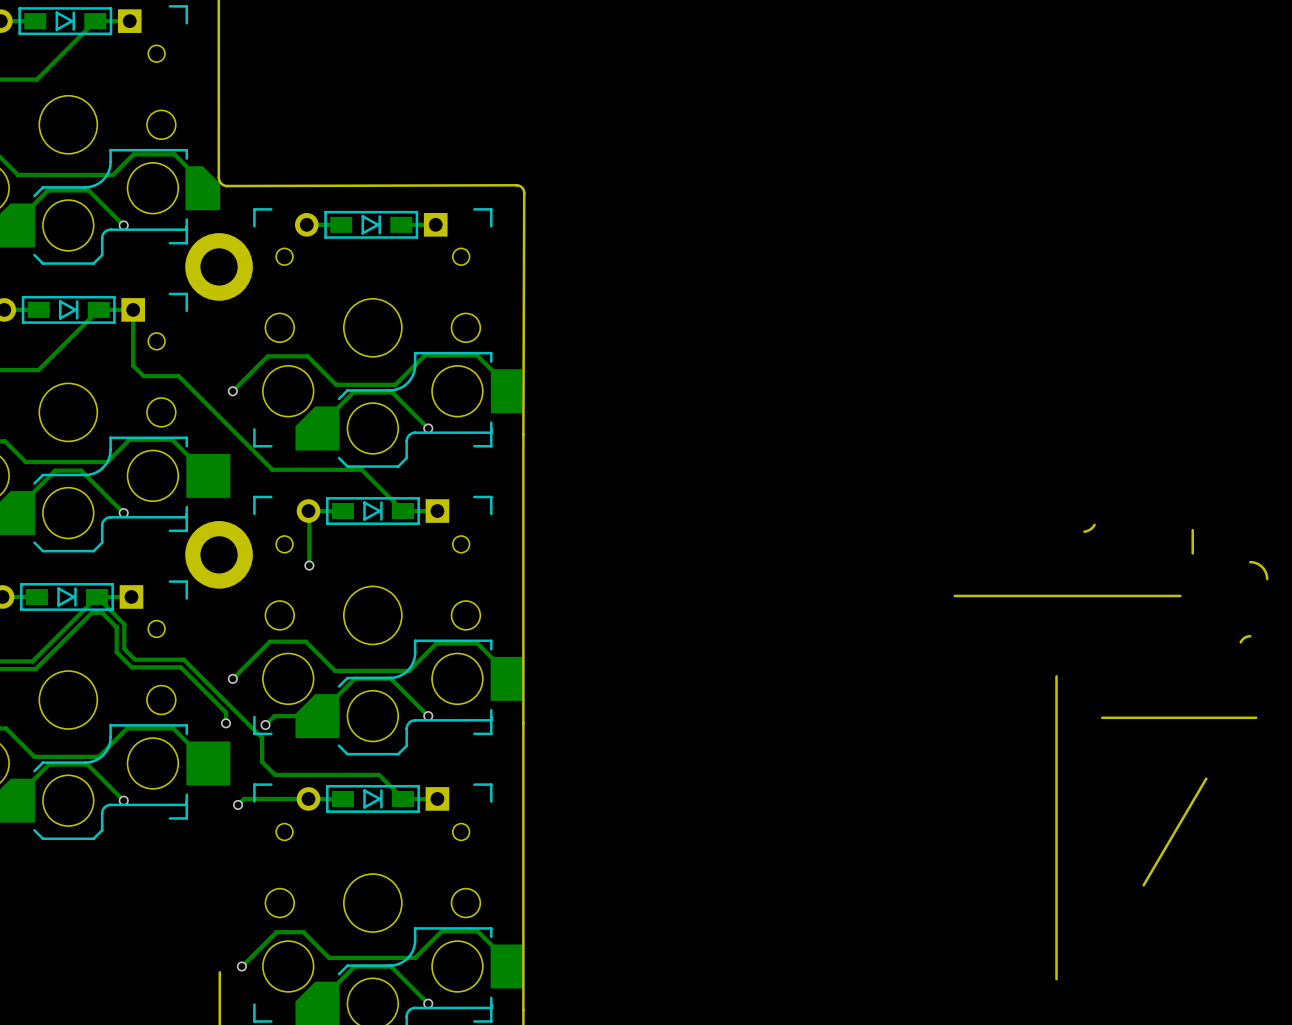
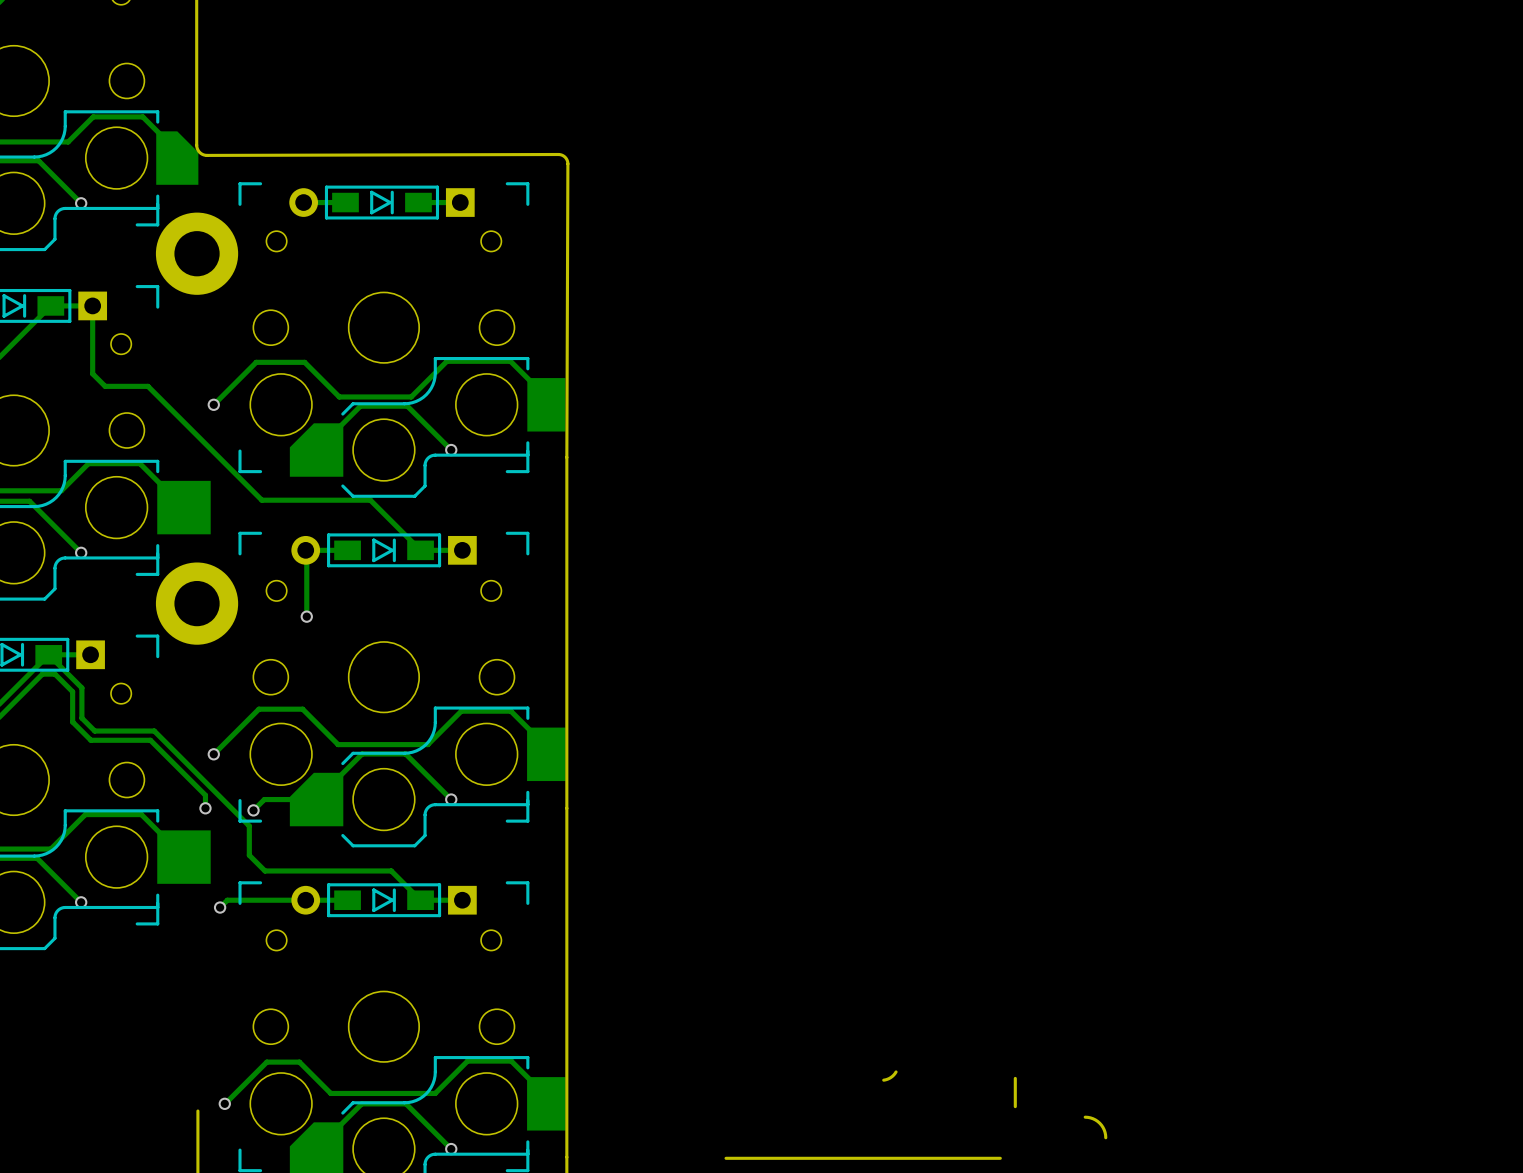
board edge: (1094, 524) (1084, 531) -> none
board edge: (1192, 530) (1192, 553) -> none
board edge: (1250, 562) (1262, 567) (1267, 579) -> none
board edge: (1180, 595) (954, 595) -> none
board edge: (1250, 636) (1244, 637) (1240, 642) -> none
board edge: (1056, 676) (1056, 979) -> none
board edge: (1256, 717) (1102, 717) -> none
board edge: (1206, 778) (1143, 885) -> none
board edge: none -> (896, 1071) (890, 1077) (883, 1080)
board edge: none -> (1015, 1078) (1015, 1106)
board edge: none -> (1085, 1117) (1093, 1118) (1099, 1123) (1104, 1129) (1105, 1137)
board edge: none -> (1000, 1158) (726, 1158)

